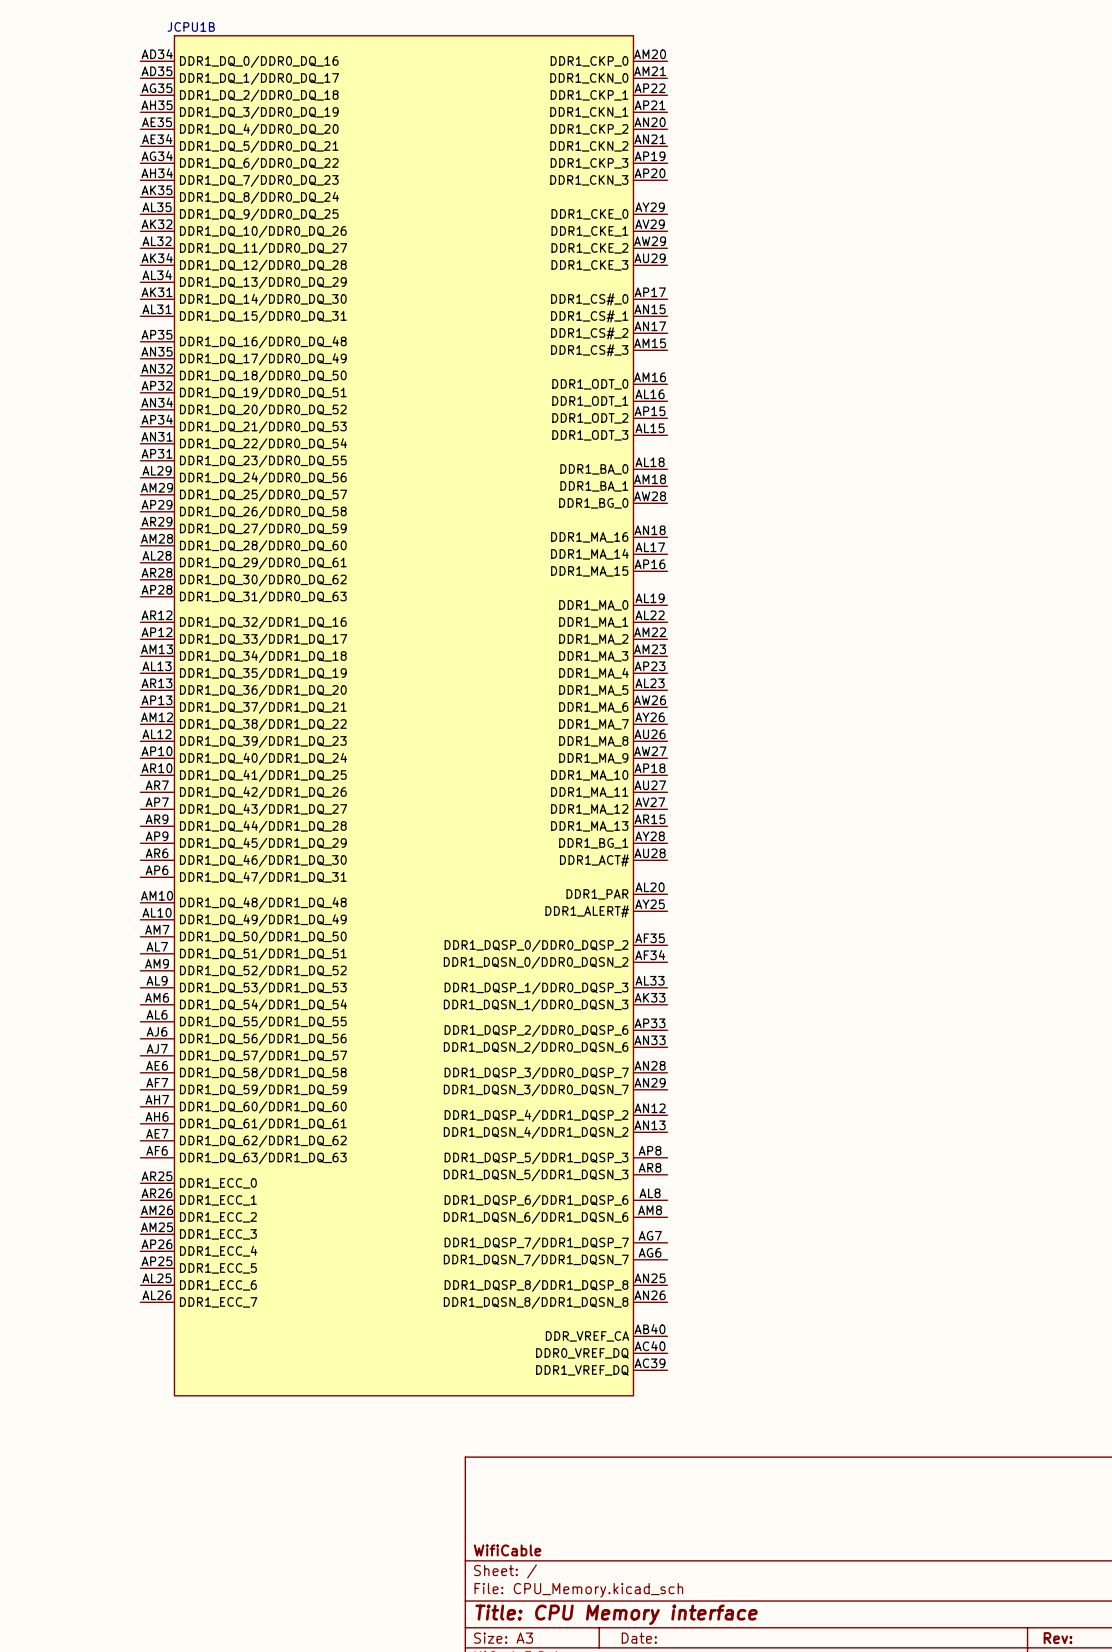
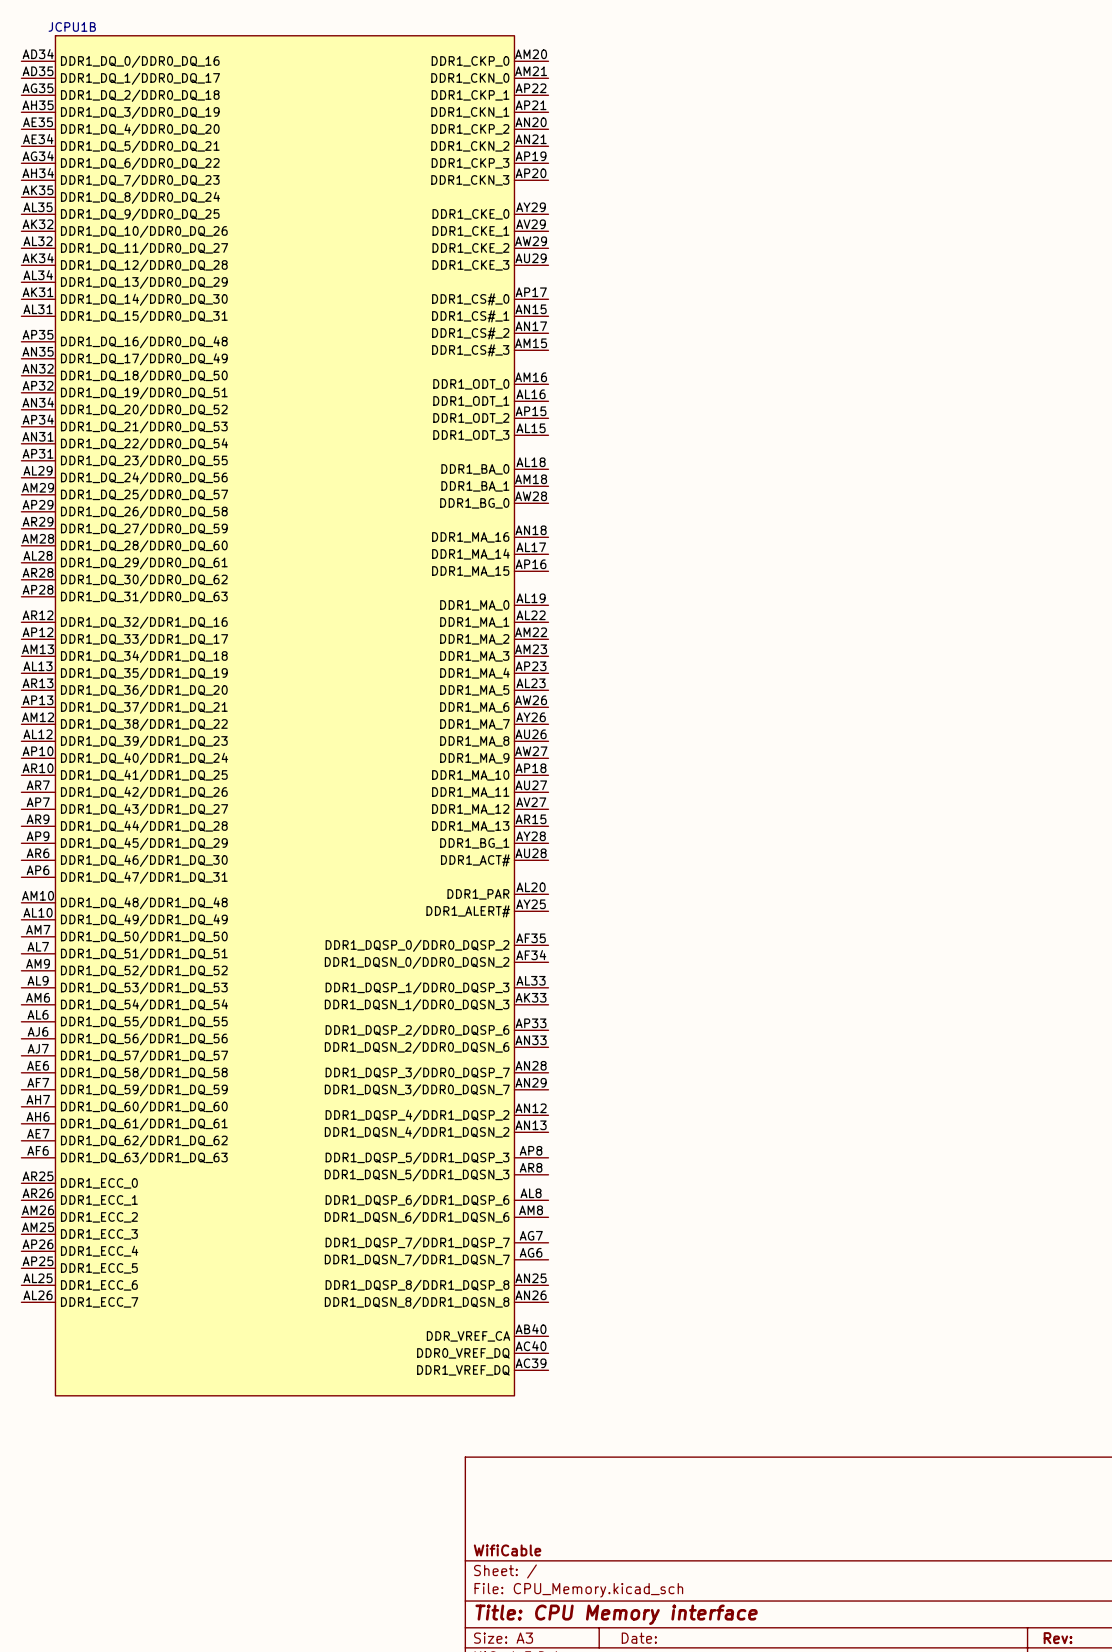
JCPU1B position: (403, 715) -> (284, 715)

